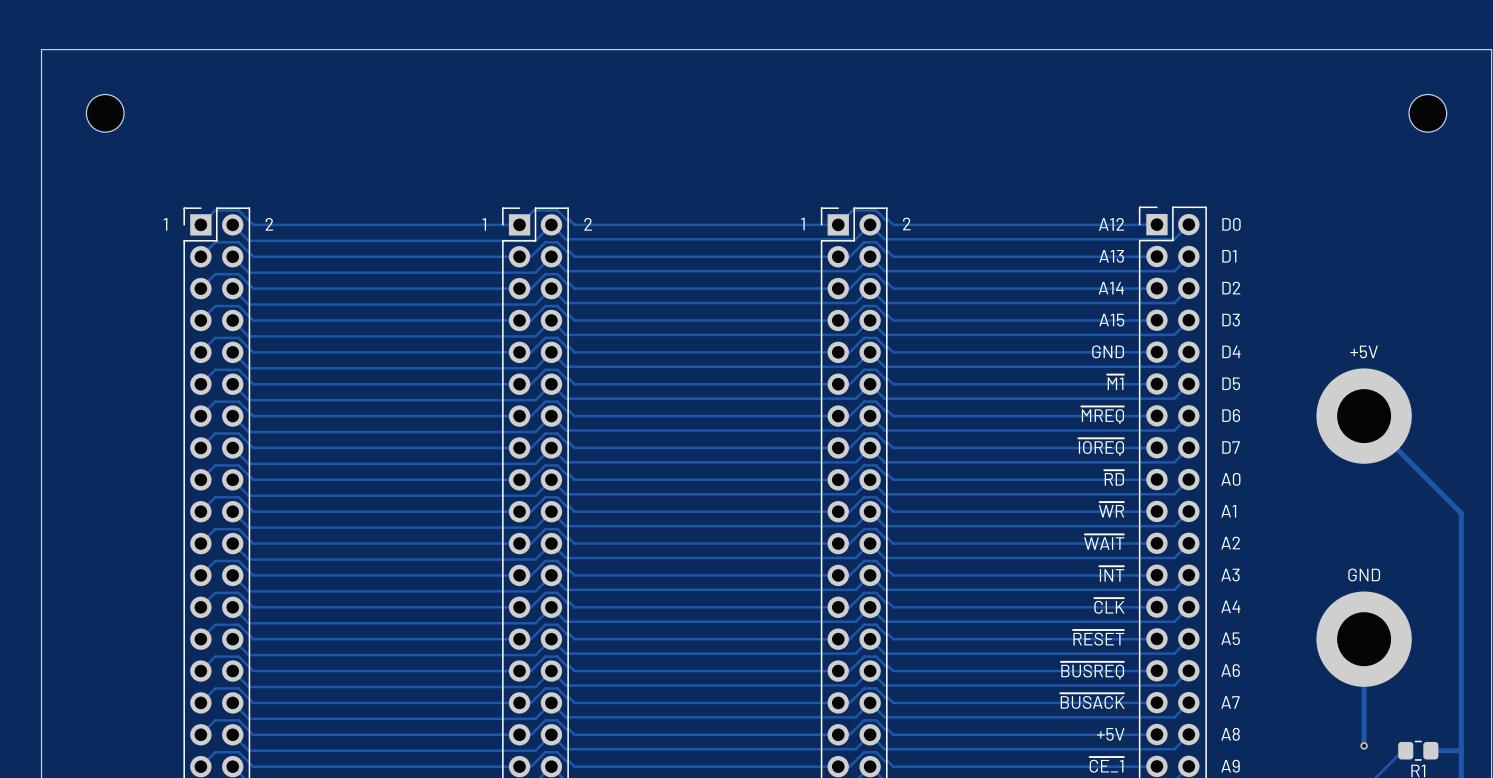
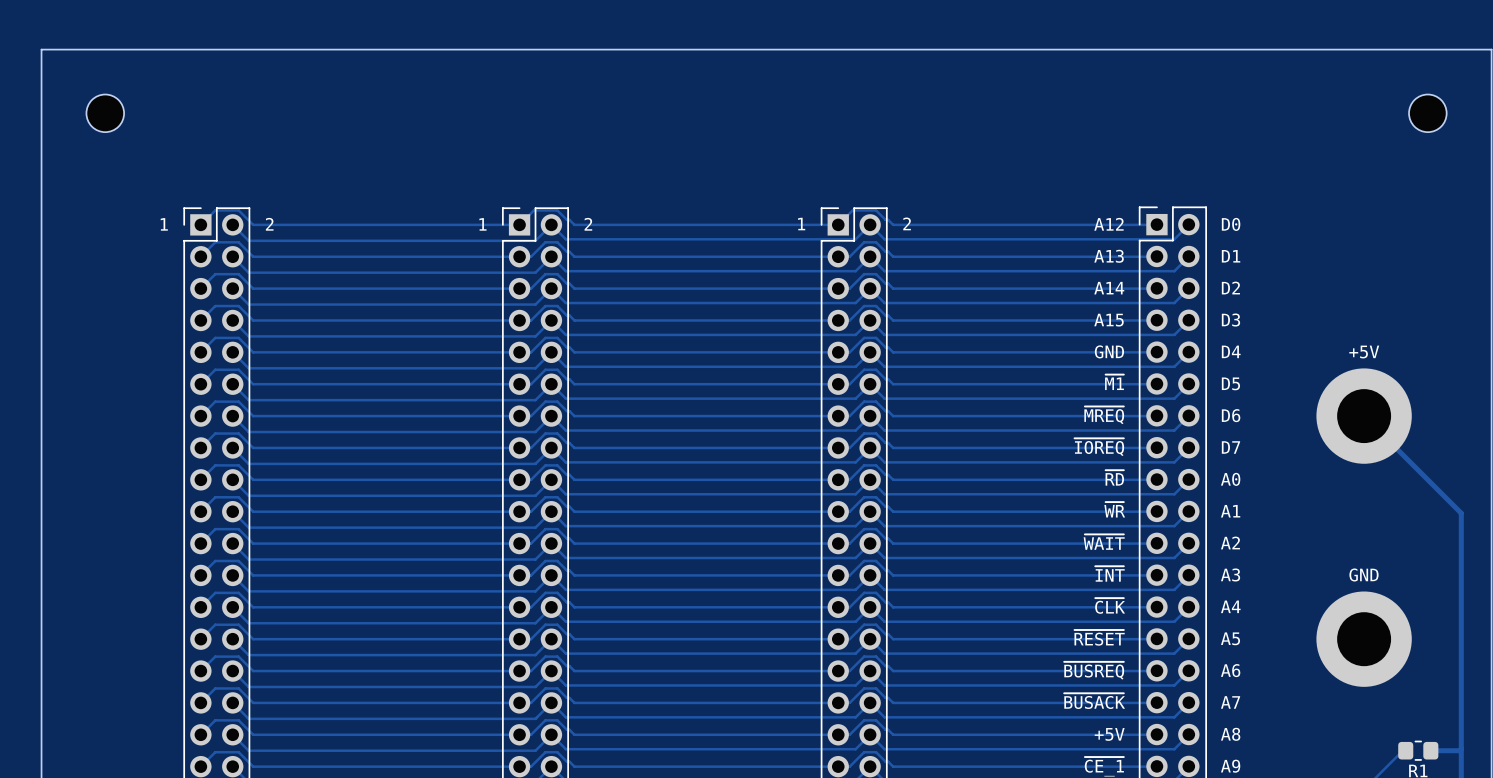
track: (1364, 673) (1364, 745) -> none
via: (1364, 745) -> none

